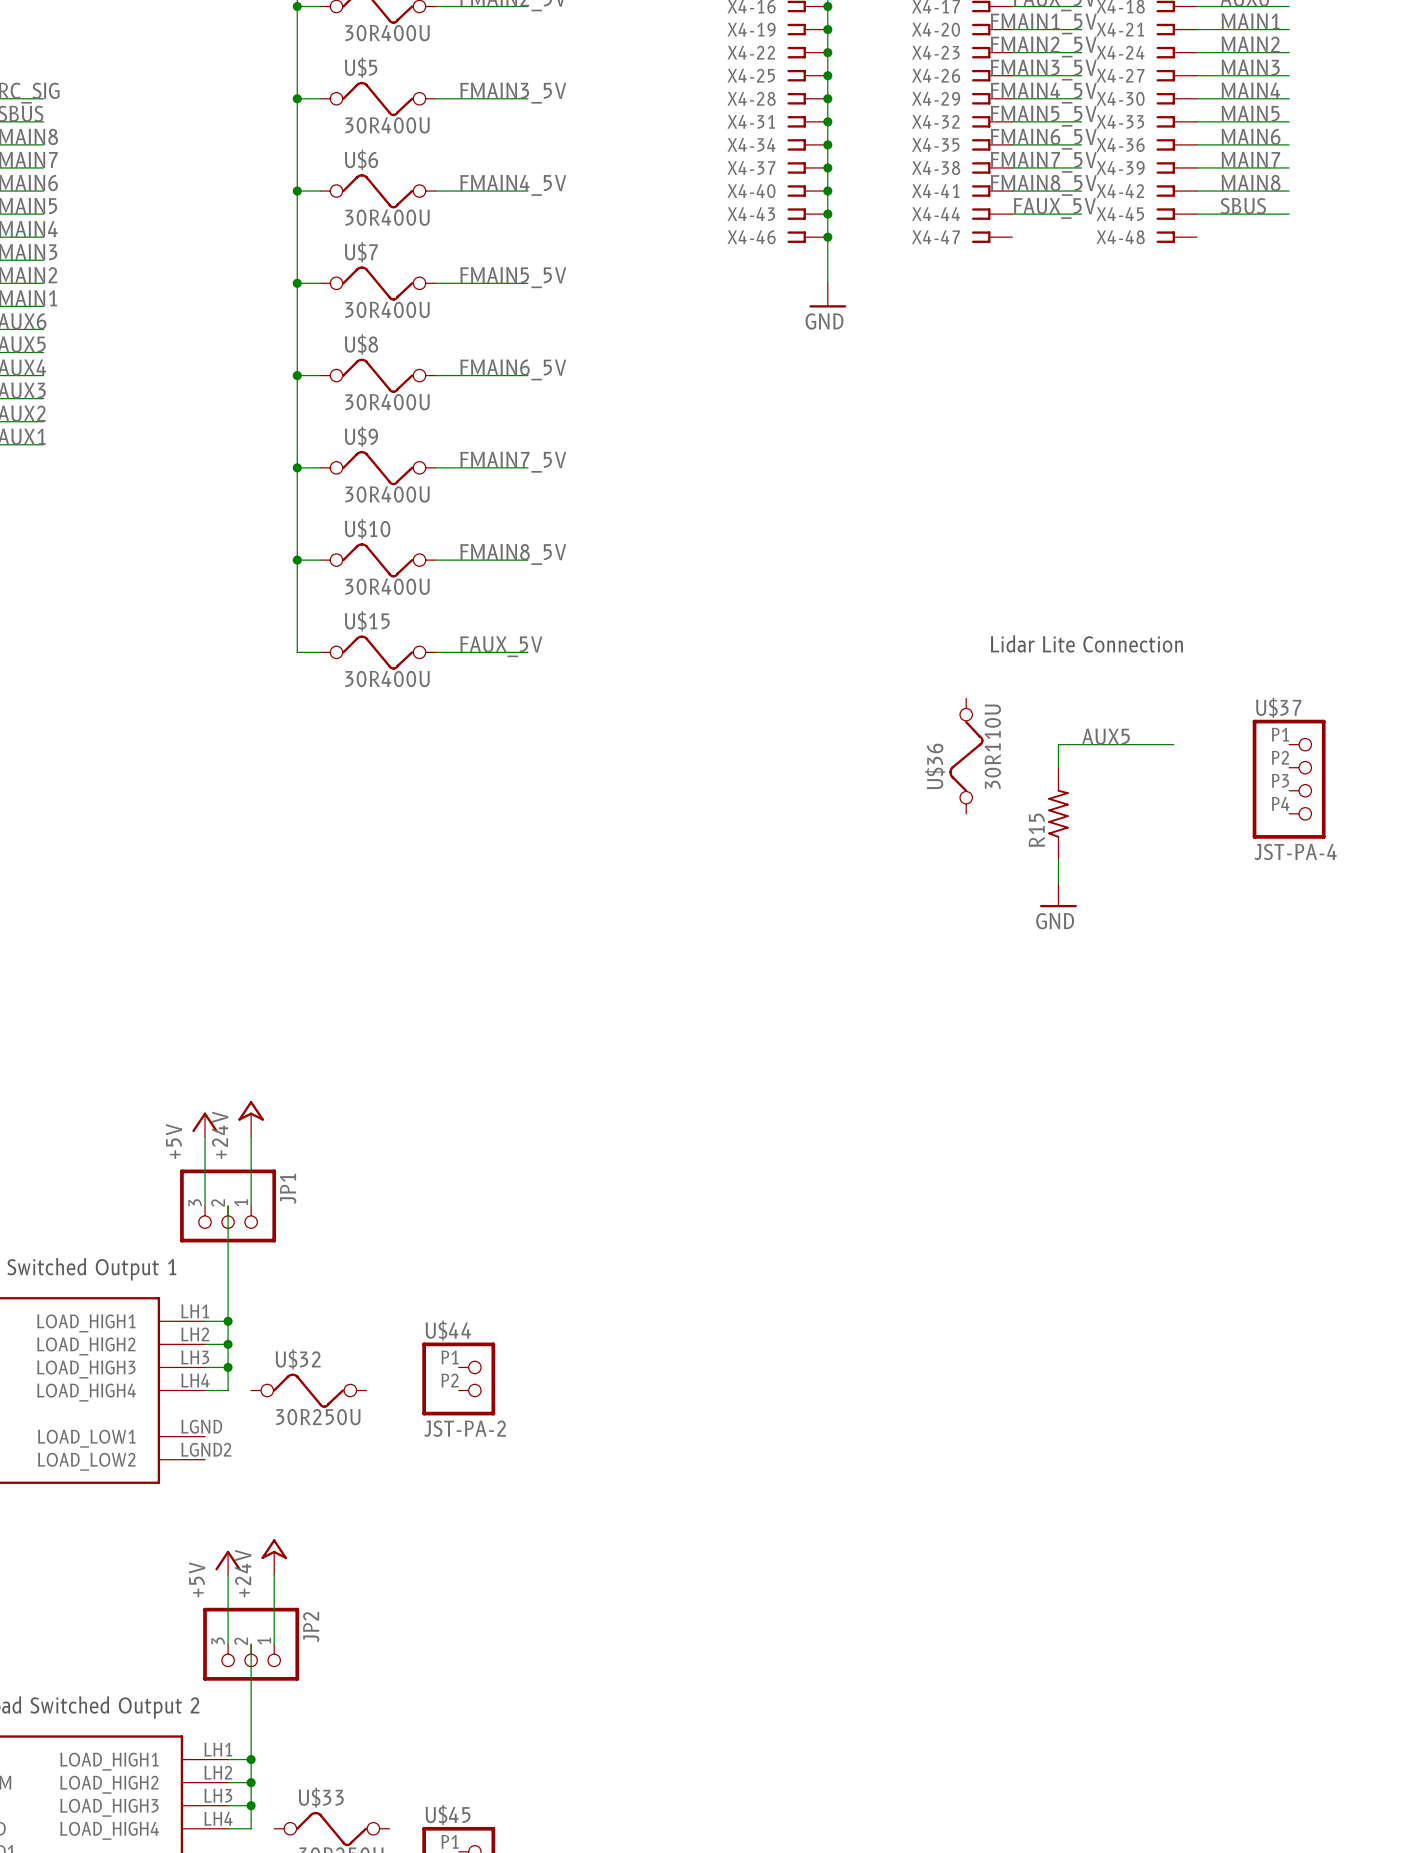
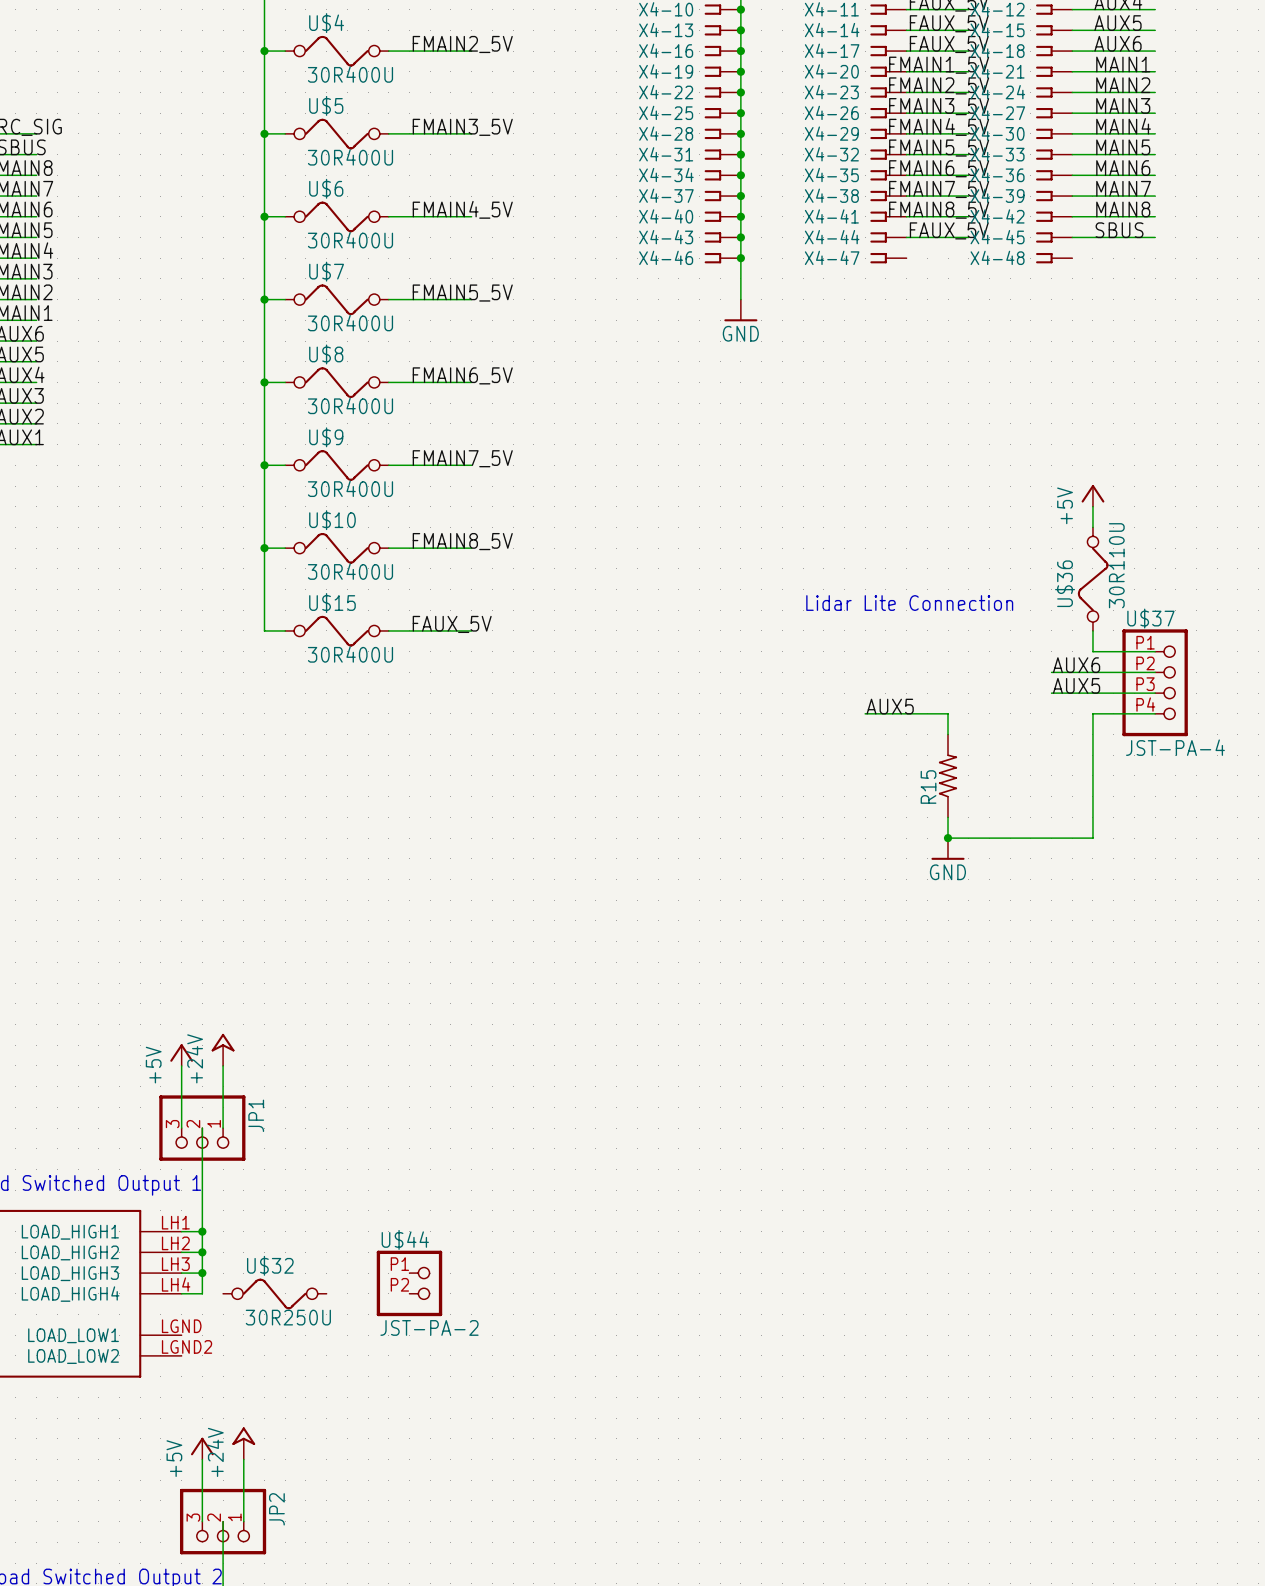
power symbol: none -> +5V (1092, 495)
wire: none -> (1092, 506) (1092, 527)
text position: Lidar Lite Connection (1086, 643) -> Lidar Lite Connection (909, 603)
wire: none -> (1092, 630) (1092, 651) (1155, 651)
label: none -> AUX6 (1076, 665)
wire: none -> (1051, 672) (1155, 672)
label: none -> AUX5 (1076, 685)
wire: none -> (1051, 693) (1155, 693)
label: none -> AUX5 (890, 706)
label: AUX5 (1105, 736) -> none
wire: (1058, 744) (1173, 744) -> (948, 713) (865, 713)
wire: none -> (1155, 713) (1092, 713) (1092, 838) (948, 838)
U$36 position: (966, 756) -> (1093, 579)
U$37 position: (1289, 779) -> (1155, 682)
junction: none -> (948, 838)

